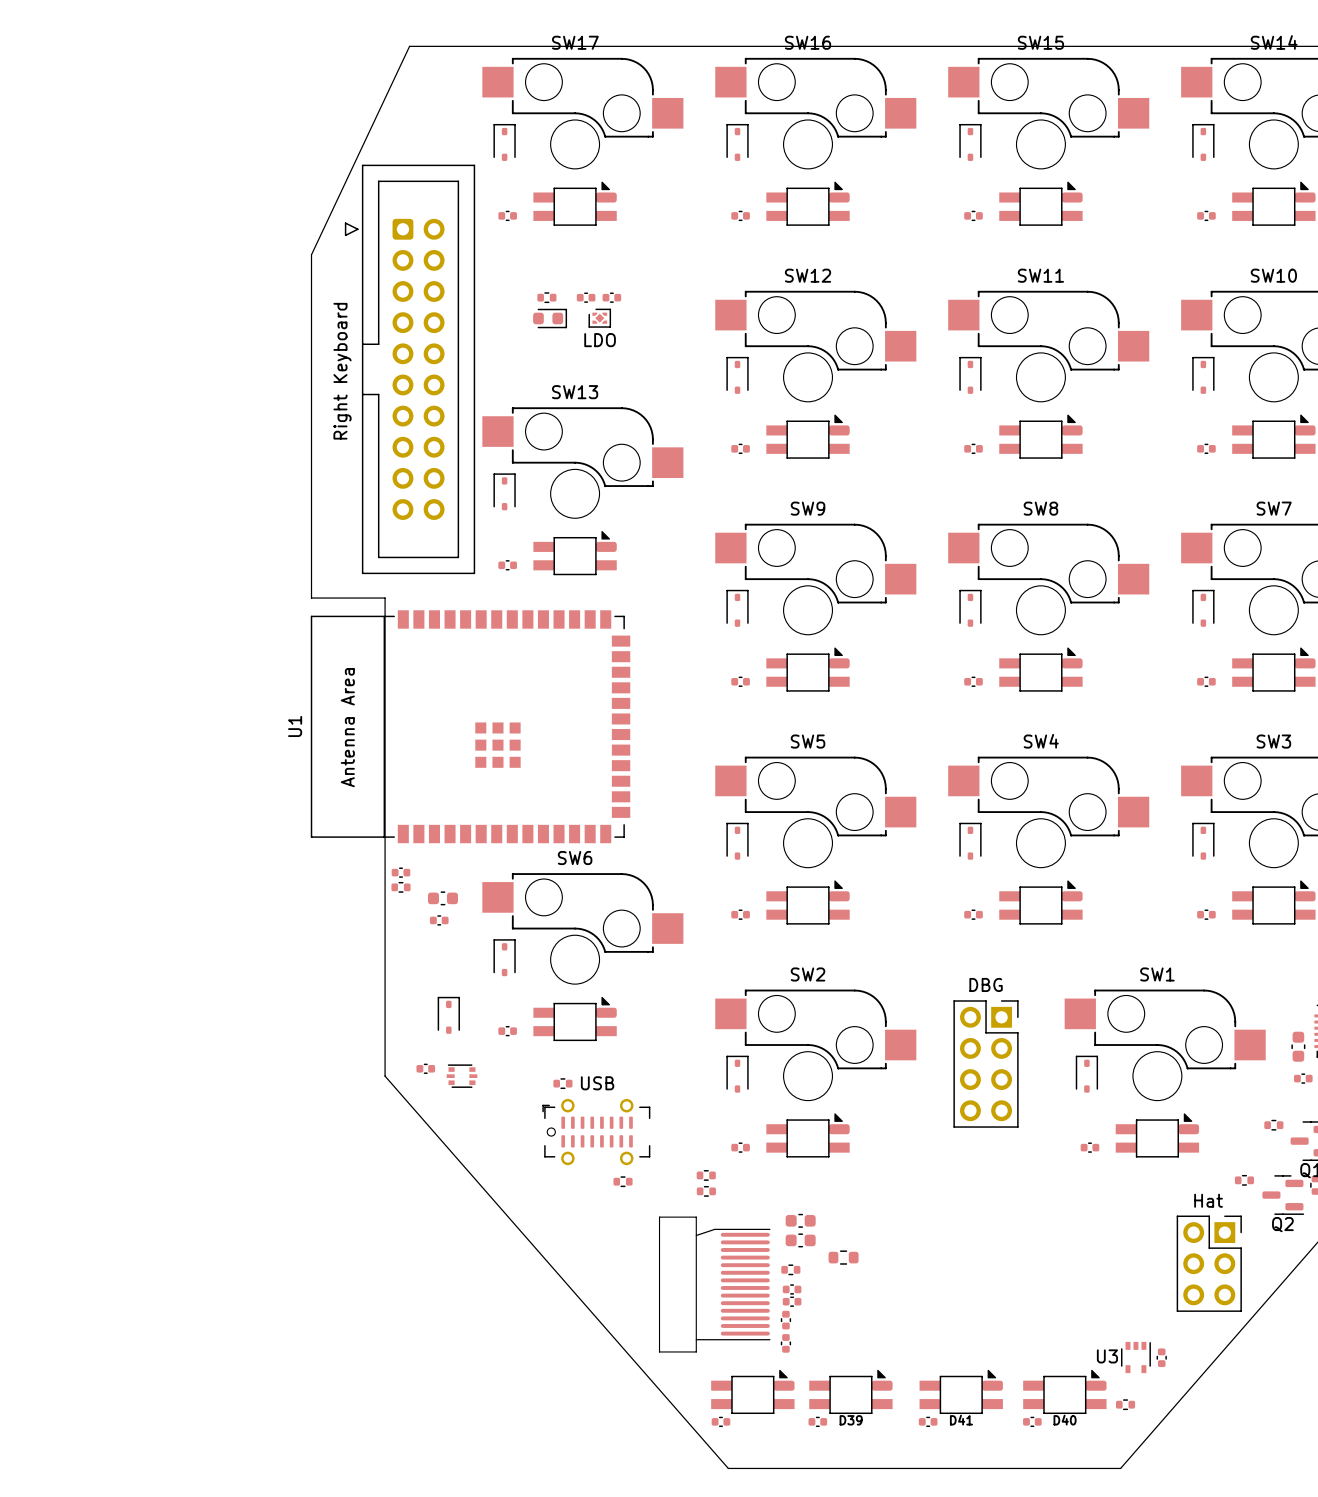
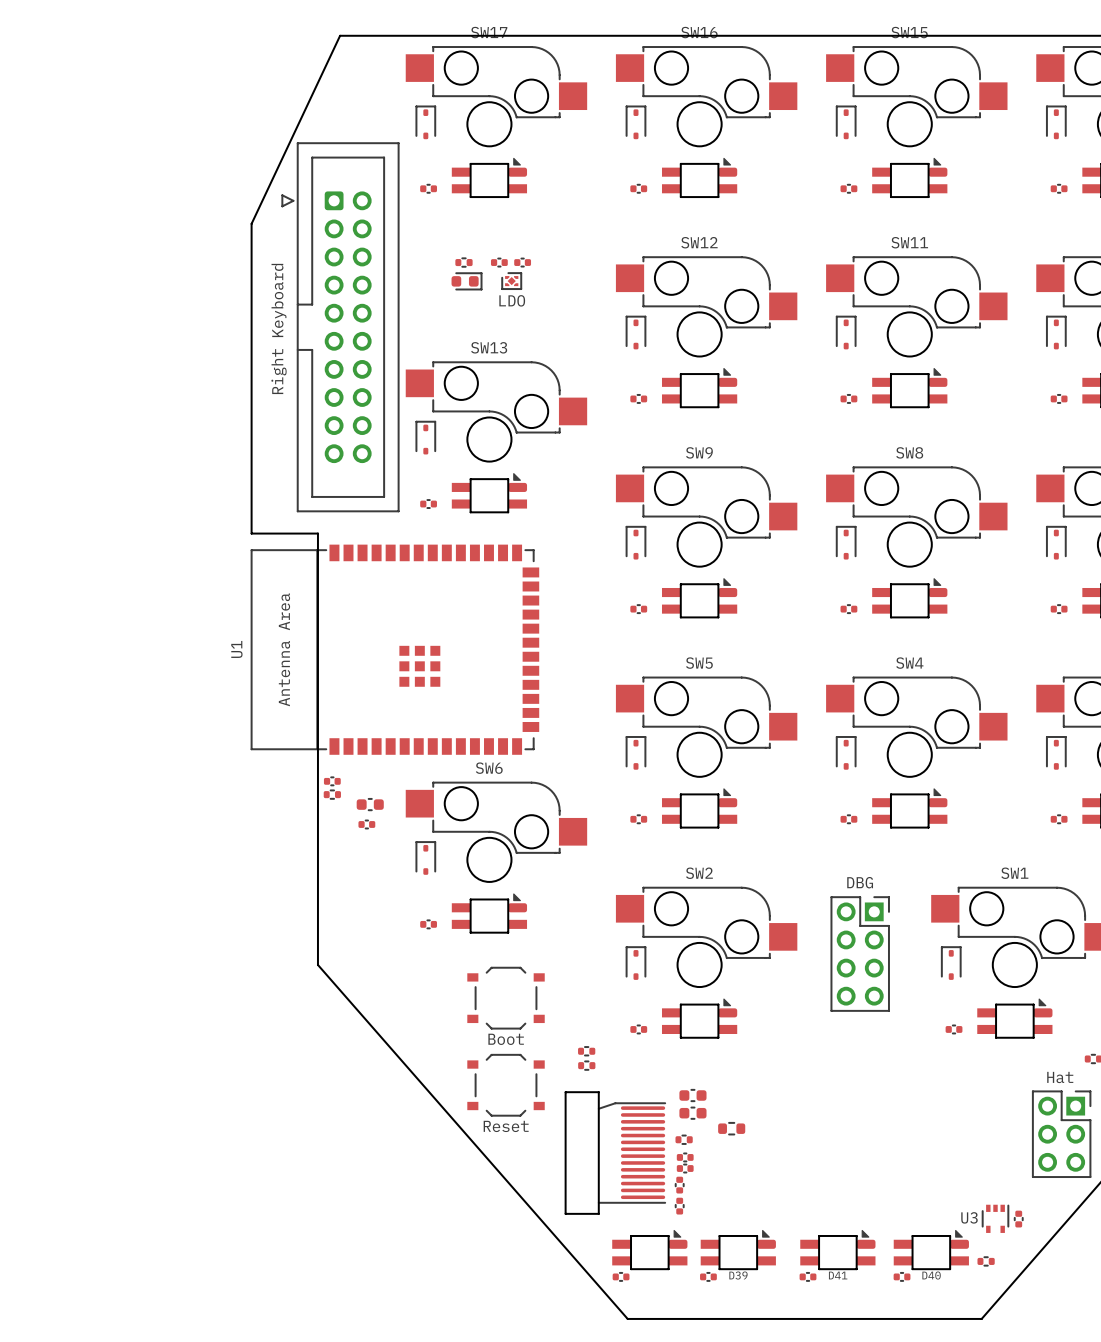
part: (448, 1015) -> none
part: (425, 1068) -> none
part: (461, 1076) -> none
part: (562, 1083) -> none
part: none -> Boot (506, 998)
part: (596, 1132) -> none
part: none -> (586, 1051)
part: (706, 1175) -> none
part: (623, 1181) -> none
part: none -> (586, 1065)
part: (706, 1191) -> none
part: none -> Reset (506, 1085)

